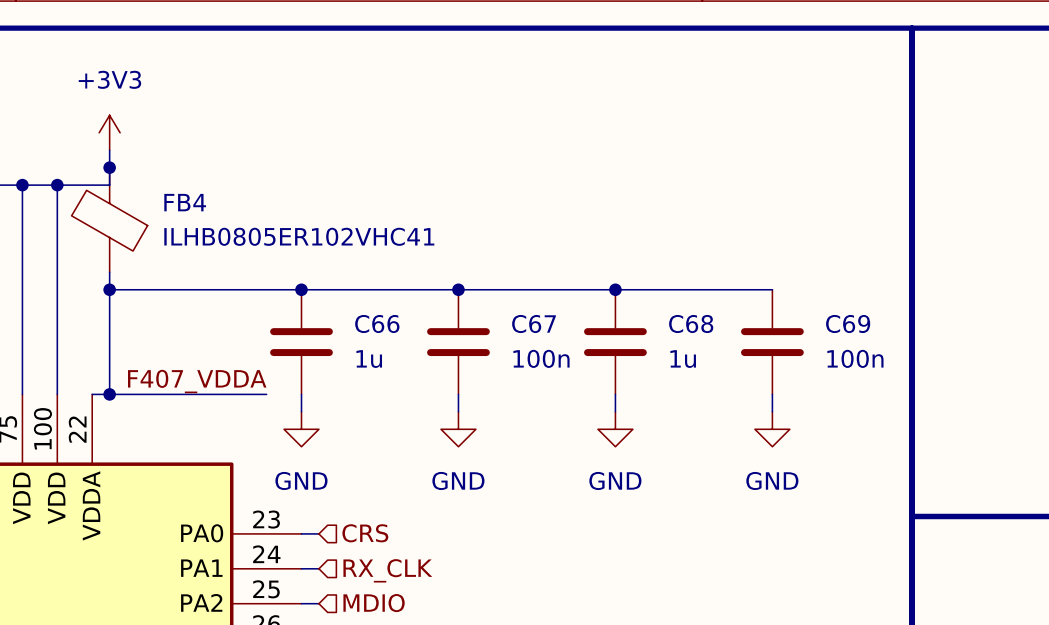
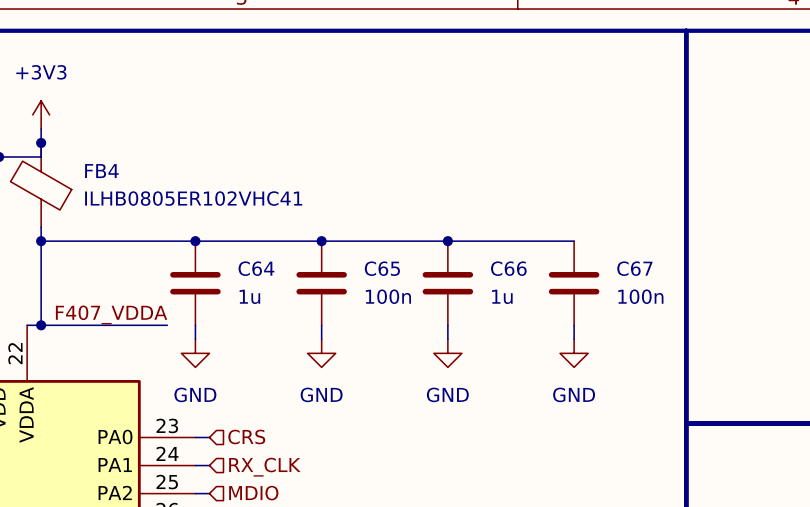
C66 name: C66 (377, 324) -> C64 (256, 268)
C67 name: C67 (534, 324) -> C65 (382, 268)
C68 name: C68 (691, 324) -> C66 (508, 268)
C69 name: C69 (848, 324) -> C67 (634, 268)

